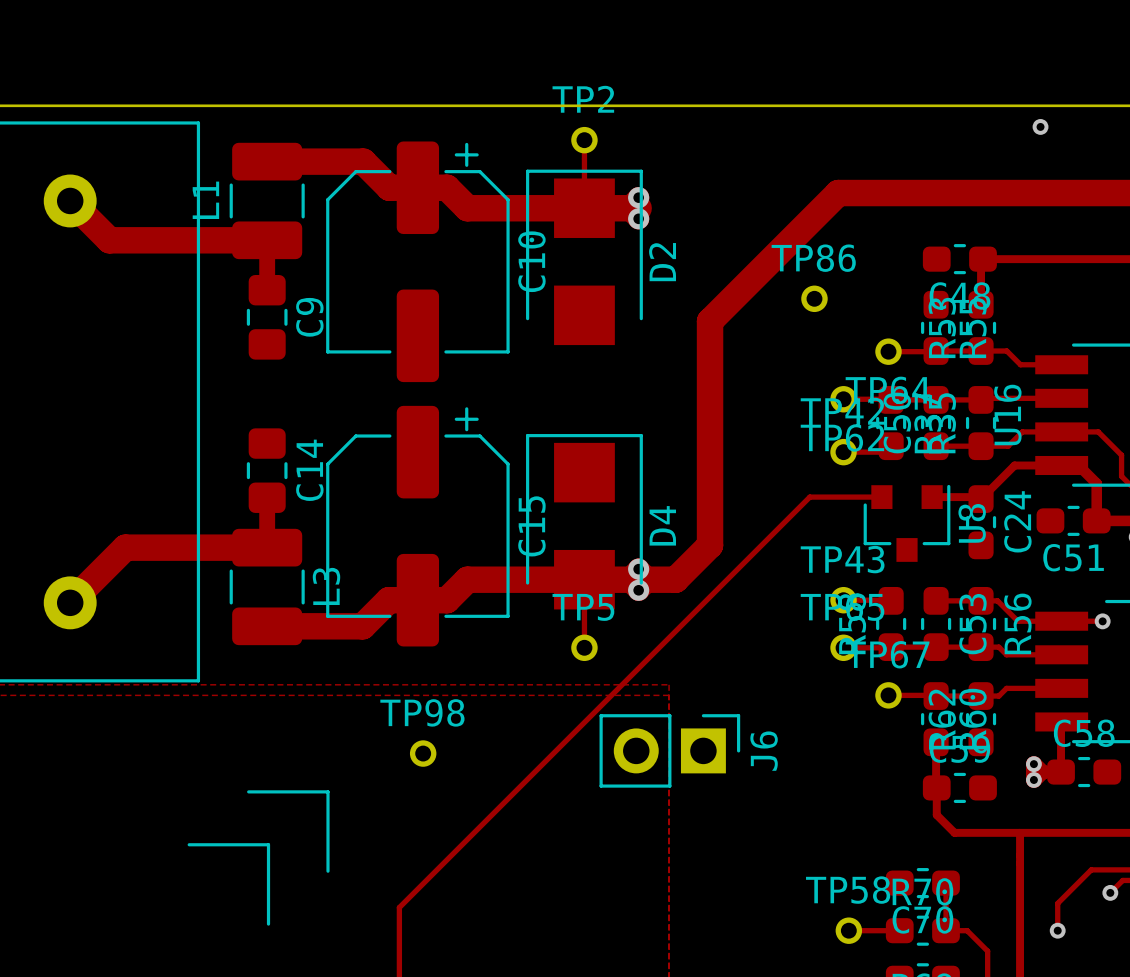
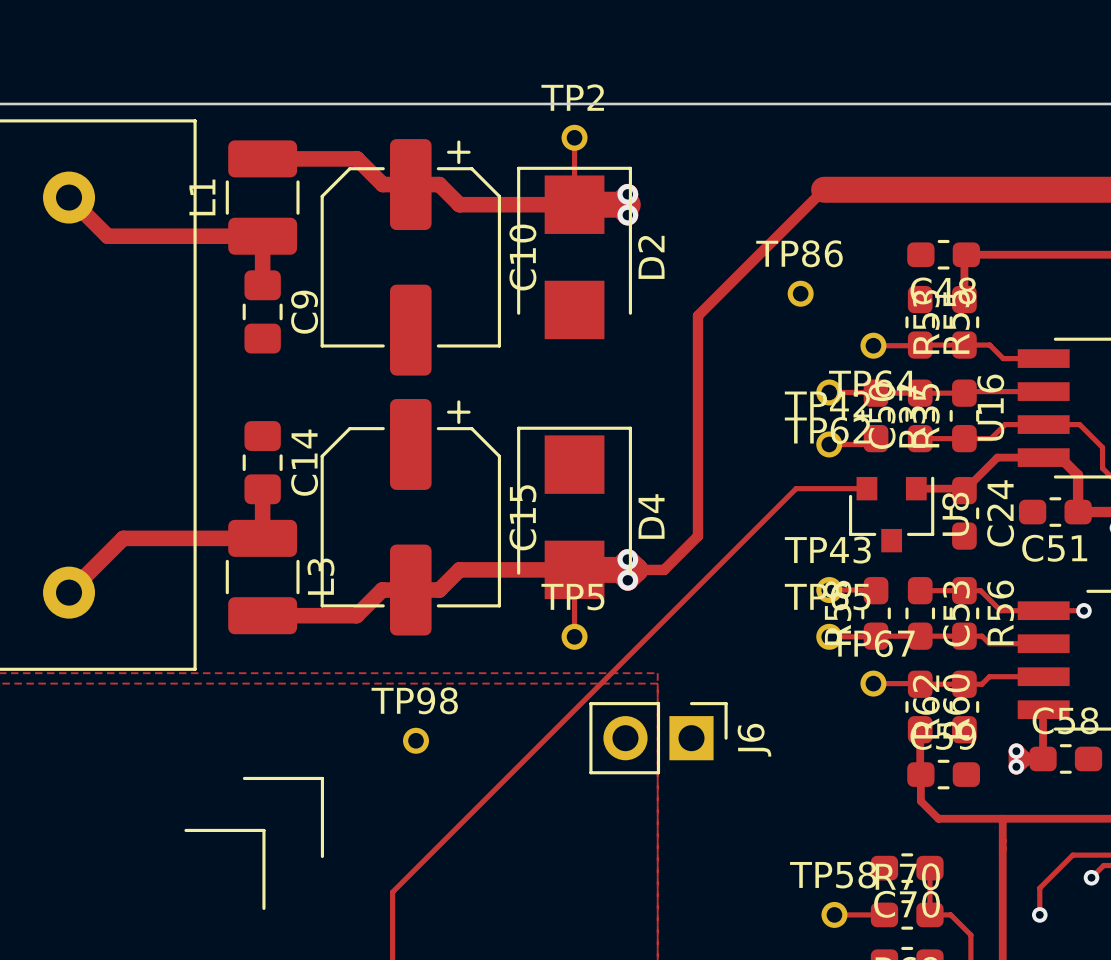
via: (1040, 126) -> none
track width: thick (267, 161) (363, 161) (389, 187) (446, 187) (467, 208) (584, 208) -> thin (262, 158) (357, 158) (382, 184) (439, 184) (459, 204) (574, 204)
track width: thick (838, 193) (710, 321) (710, 545) (675, 579) (467, 579) (446, 600) (388, 600) (362, 626) (267, 626) -> thin (824, 189) (698, 315) (698, 536) (664, 569) (459, 569) (439, 590) (382, 590) (356, 615) (262, 615)
track width: thick (70, 200) (109, 240) (267, 240) -> thin (69, 197) (107, 236) (262, 236)
track width: thick (267, 547) (125, 547) (70, 602) -> thin (262, 538) (123, 538) (69, 592)

